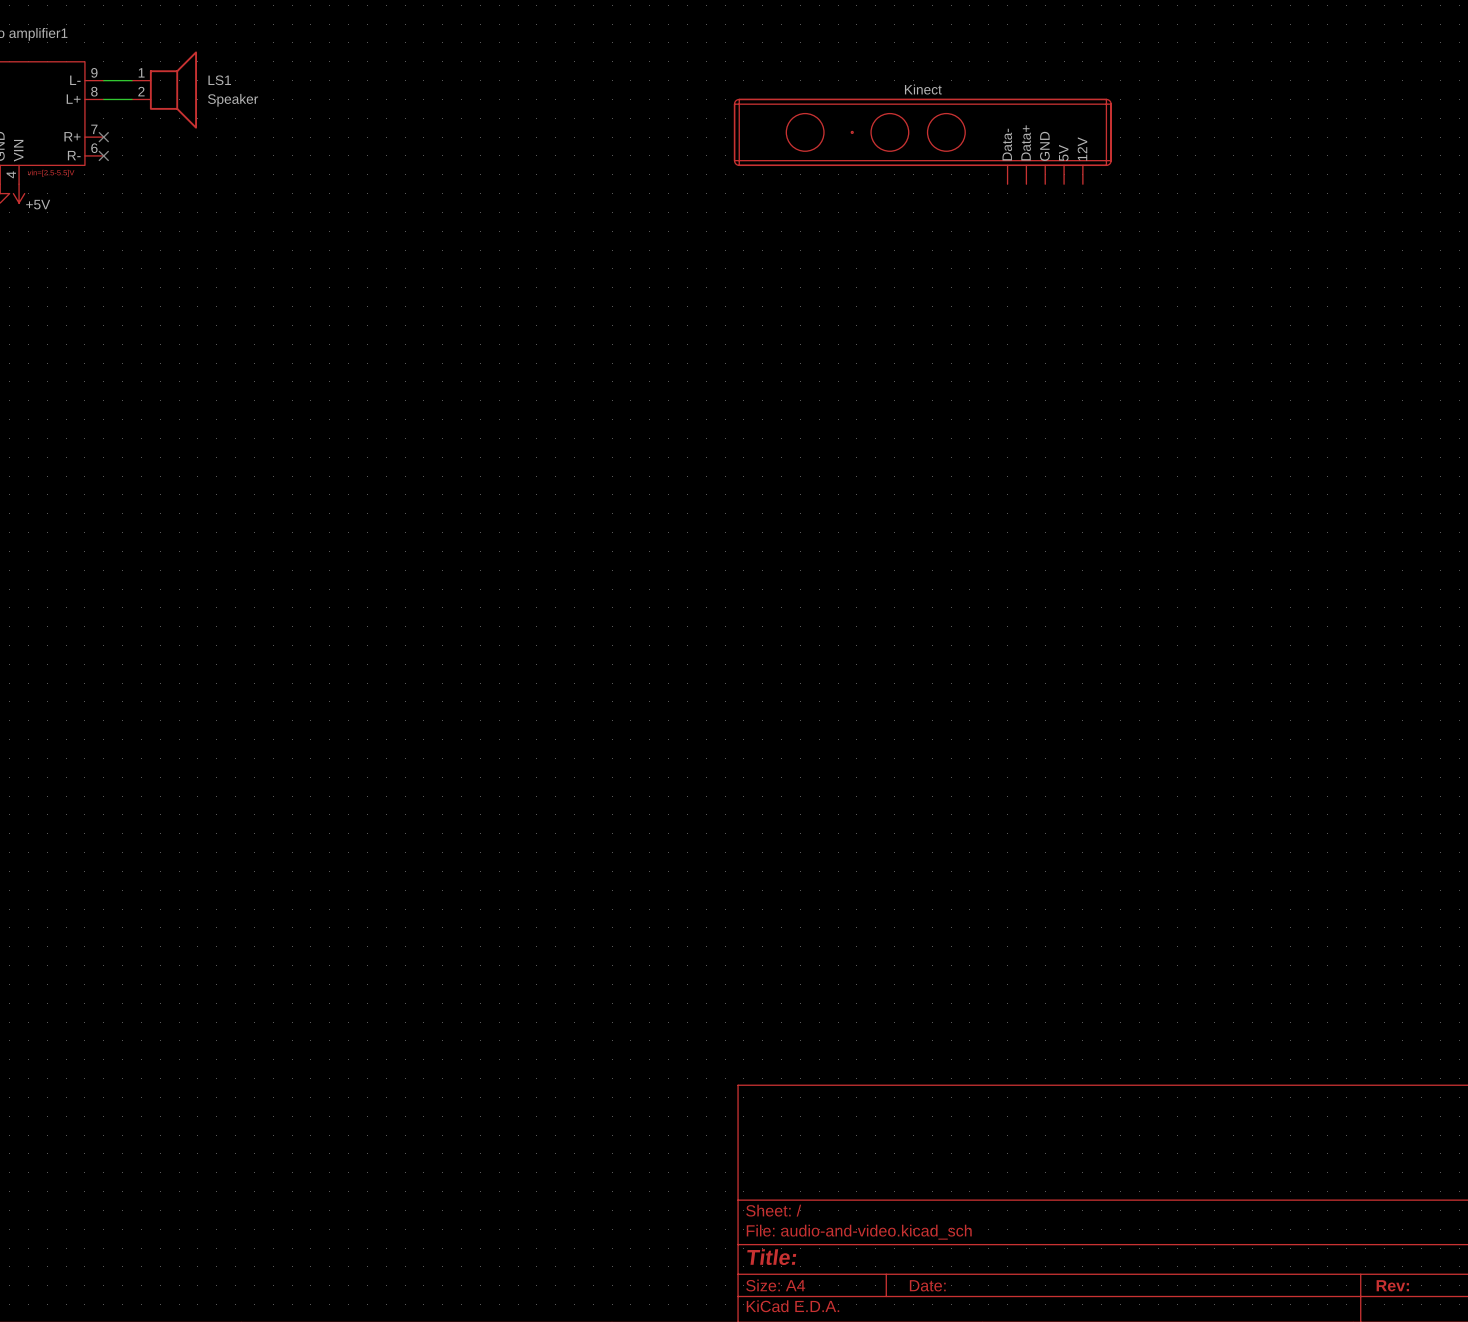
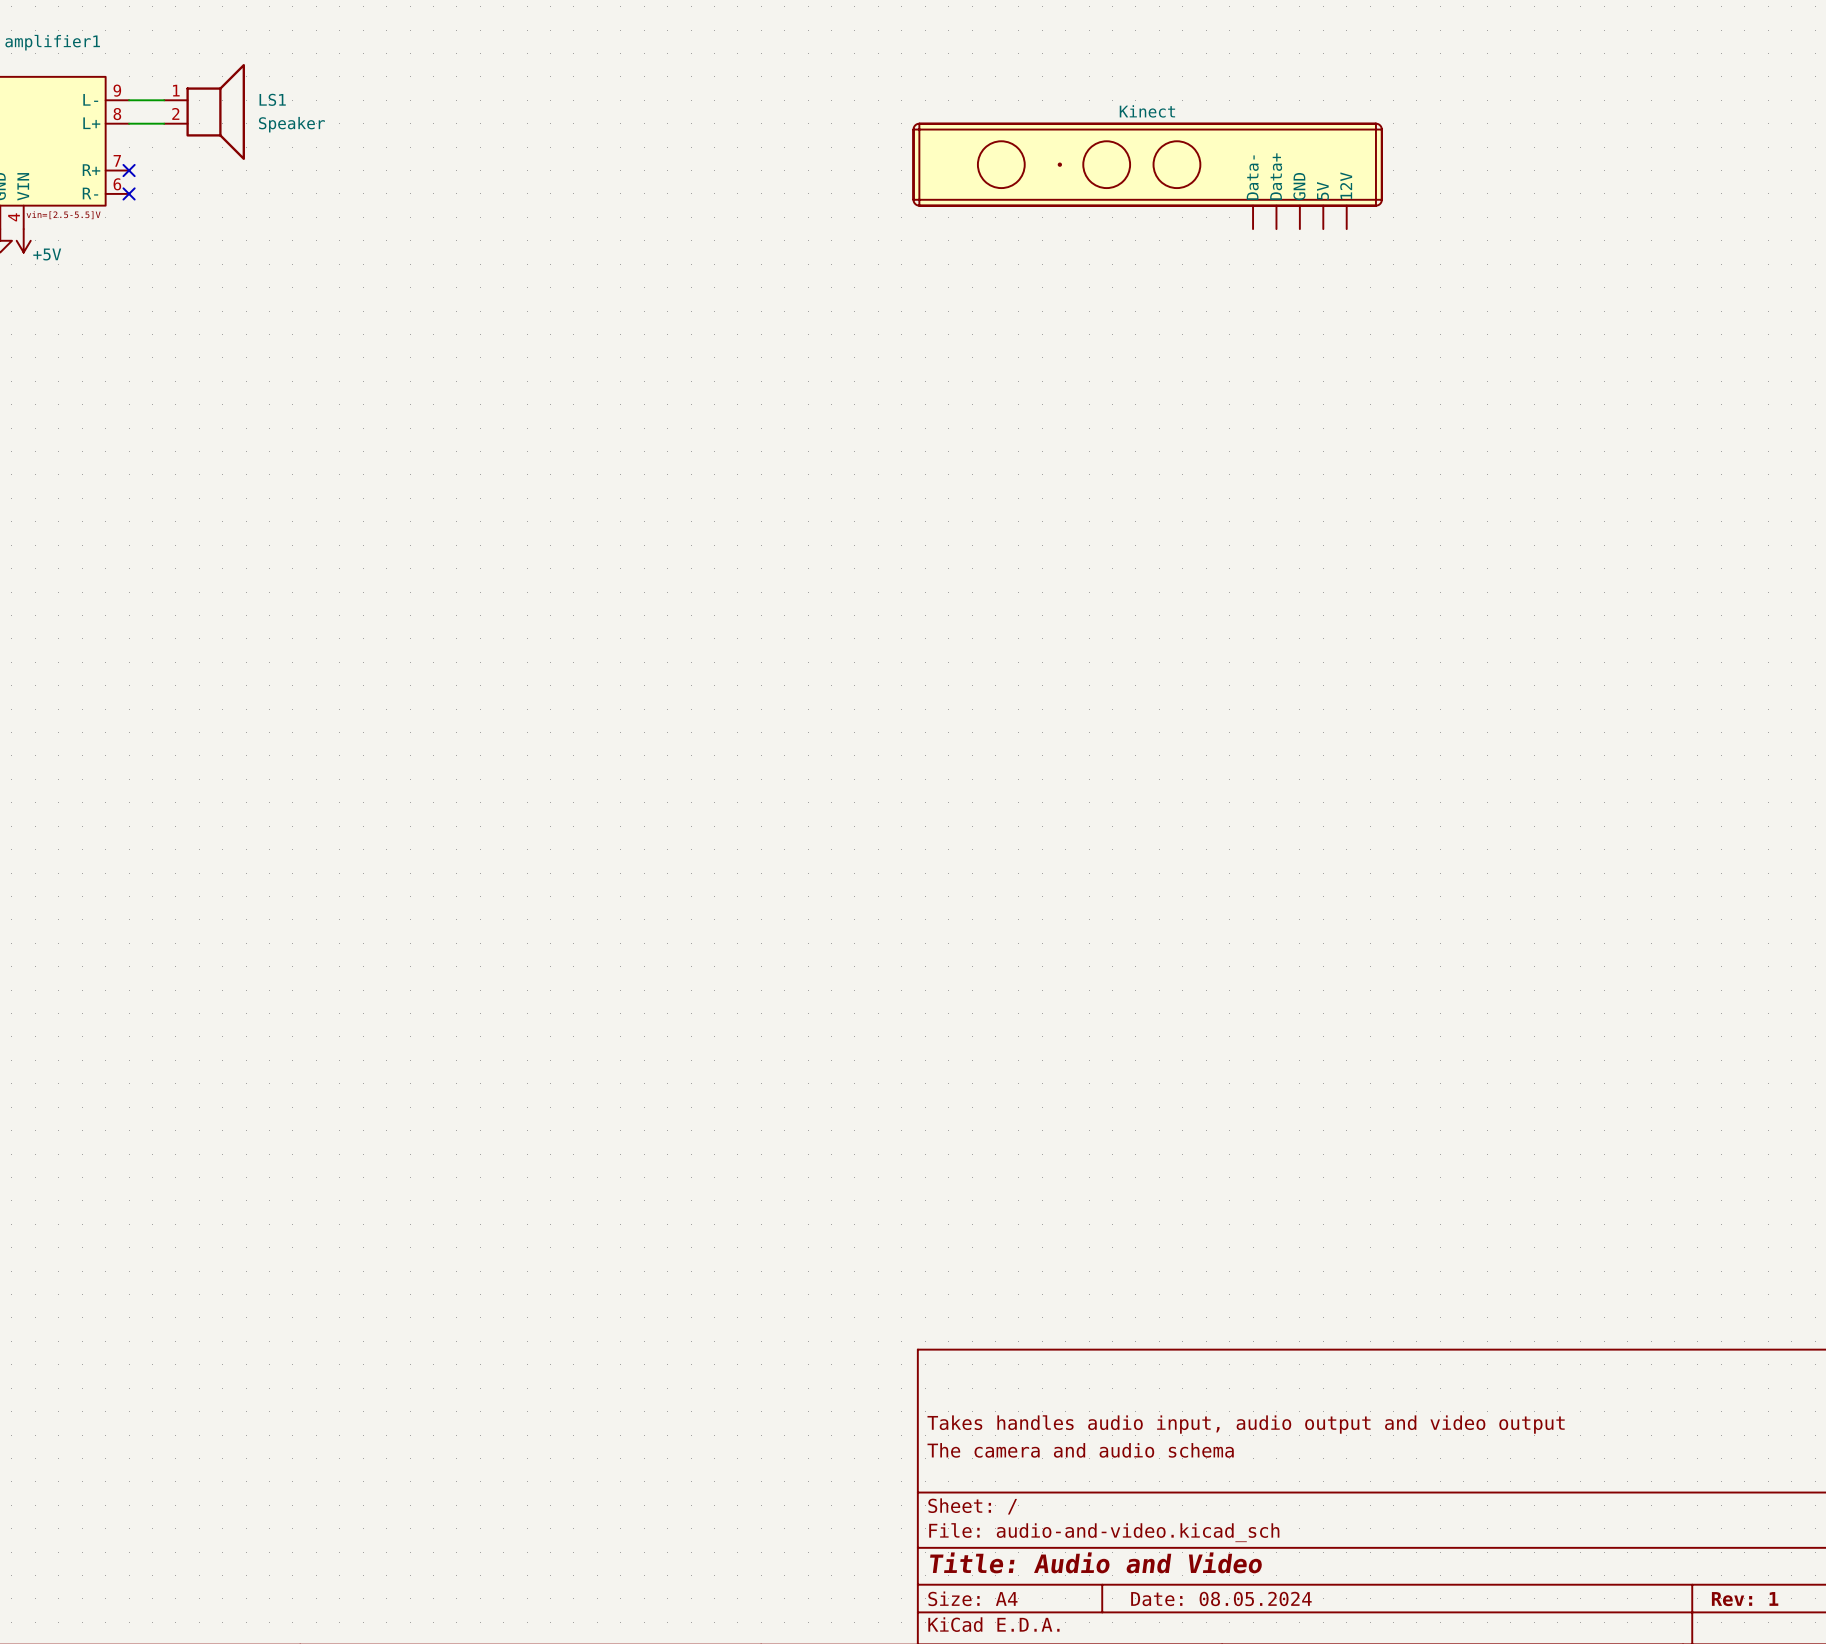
title block: none -> Takes handles audio input, audio output and video output (1246, 1424)
title block: none -> The camera and audio schema (1080, 1450)
title block: Title: (771, 1257) -> Title: Audio and Video (1096, 1562)
title block: Date: (927, 1285) -> Date: 08.05.2024 (1221, 1598)
title block: Rev: (1392, 1285) -> Rev: 1 (1745, 1599)

